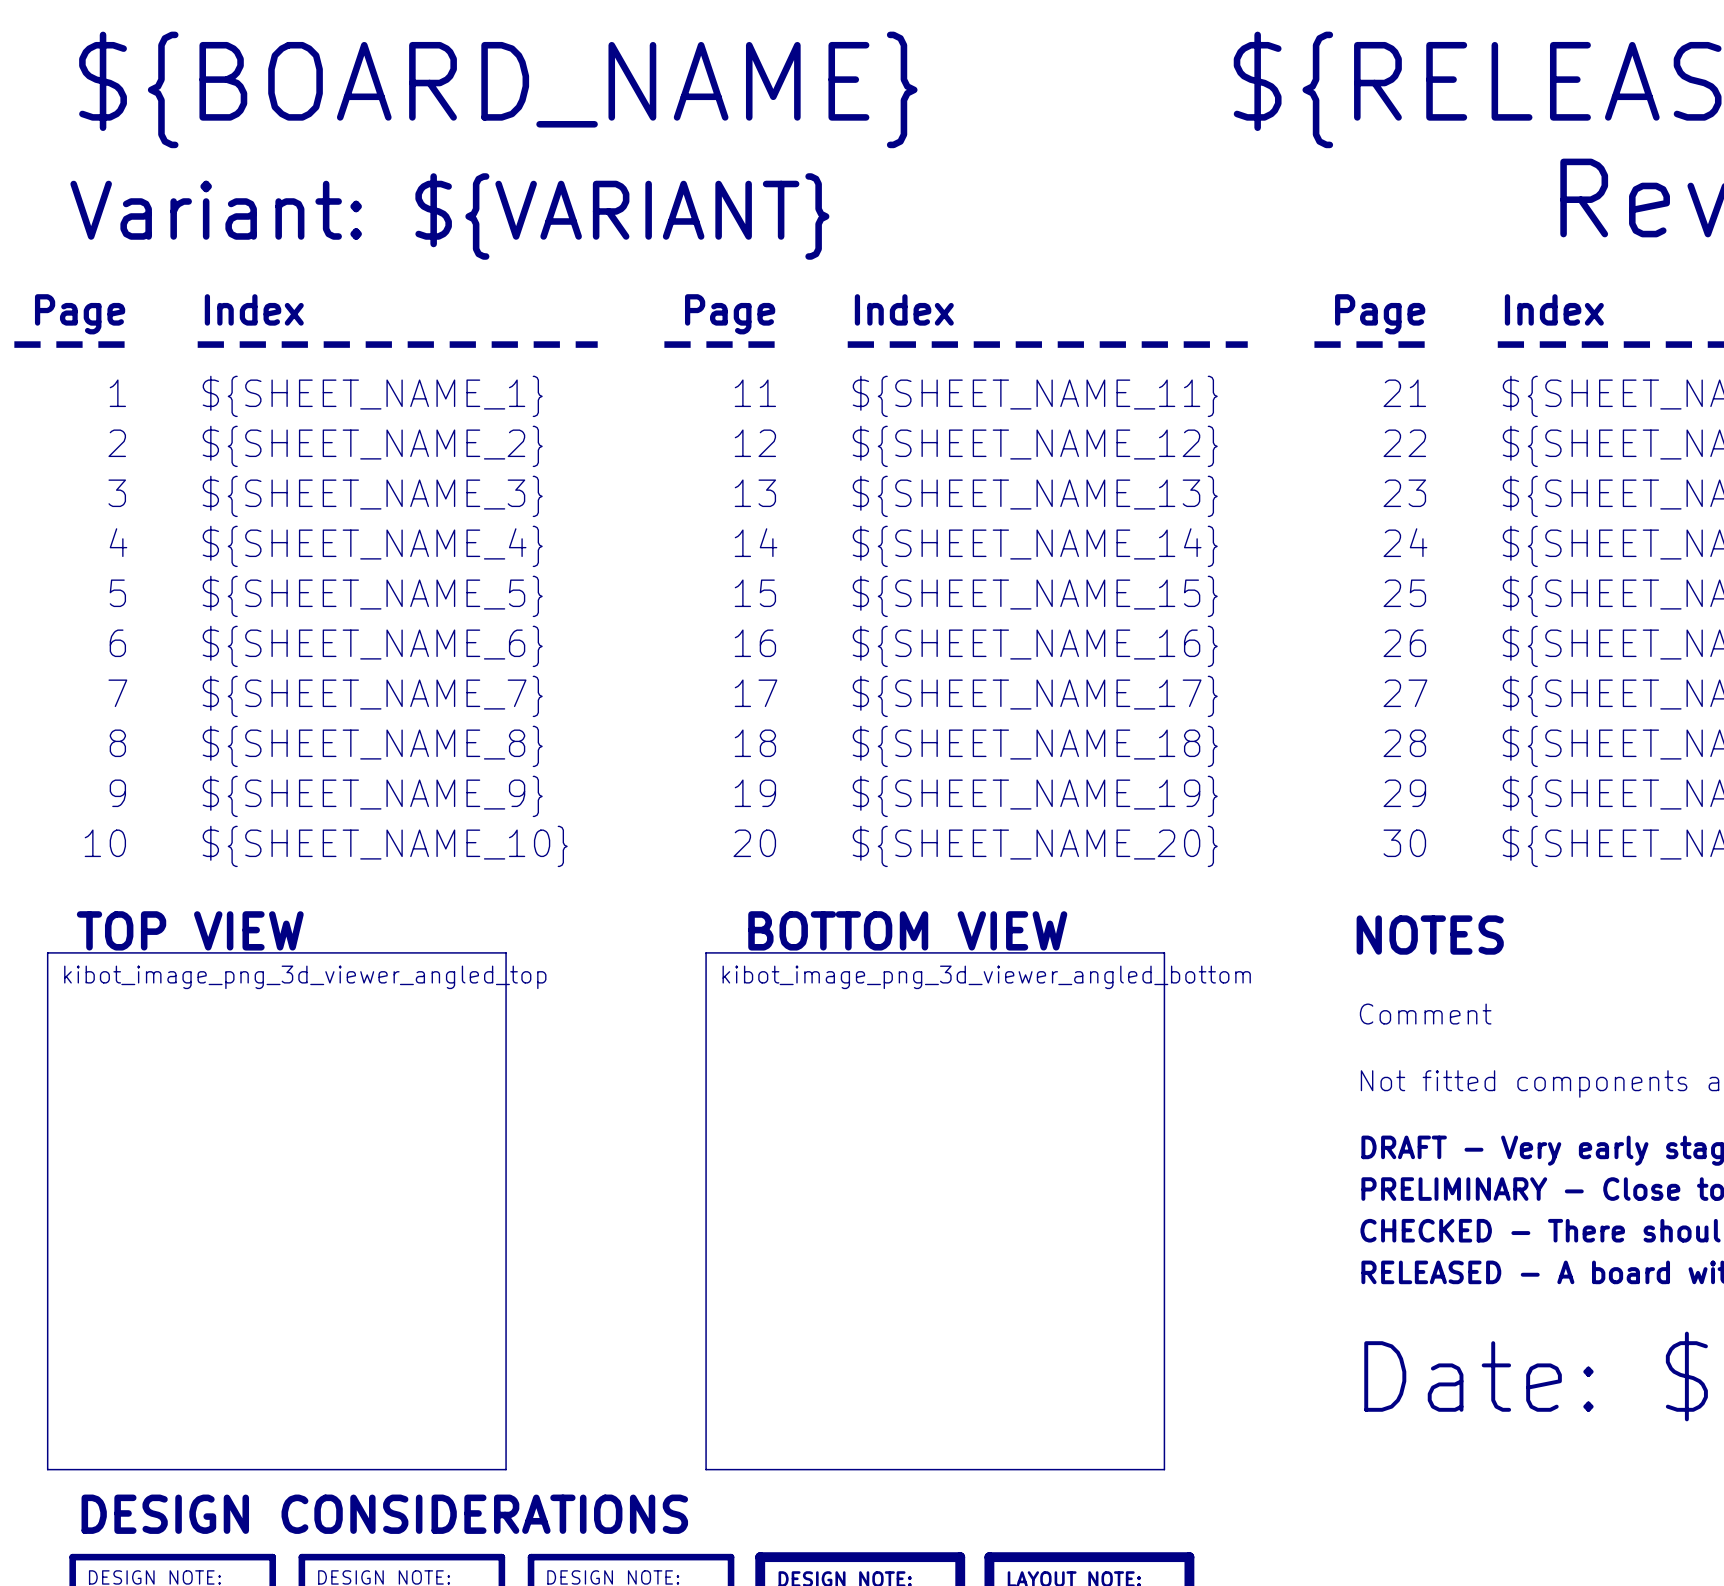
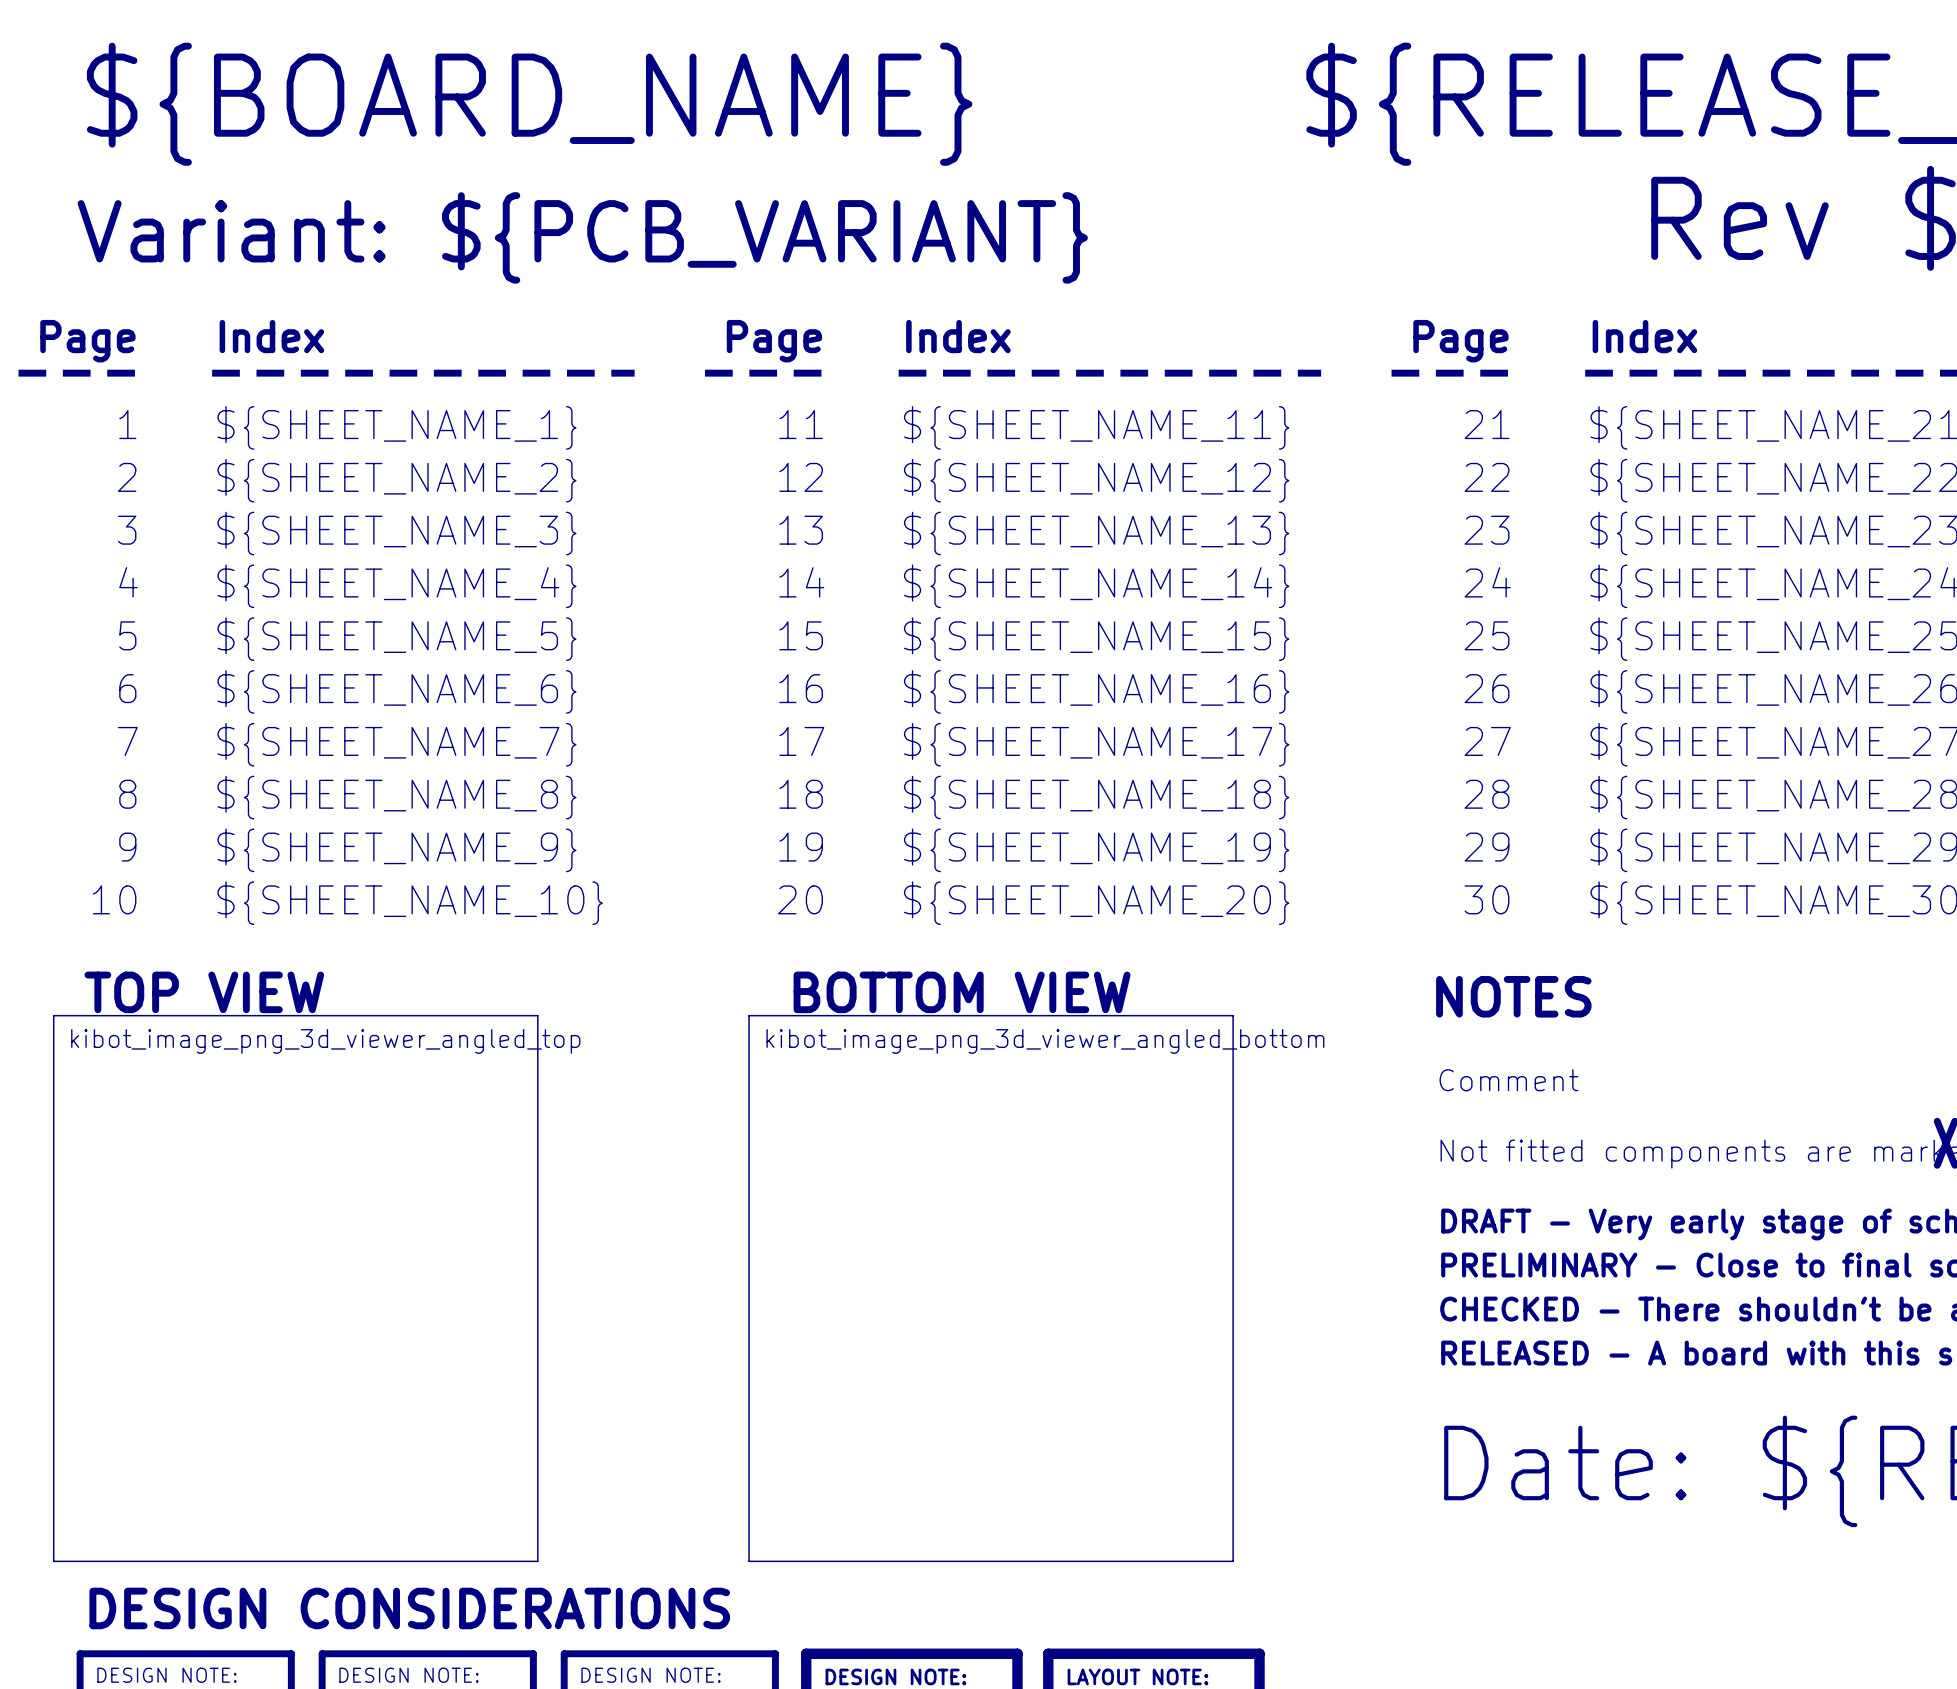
text: Variant: ${VARIANT} (449, 216) -> Variant: ${PCB_VARIANT} (582, 237)

